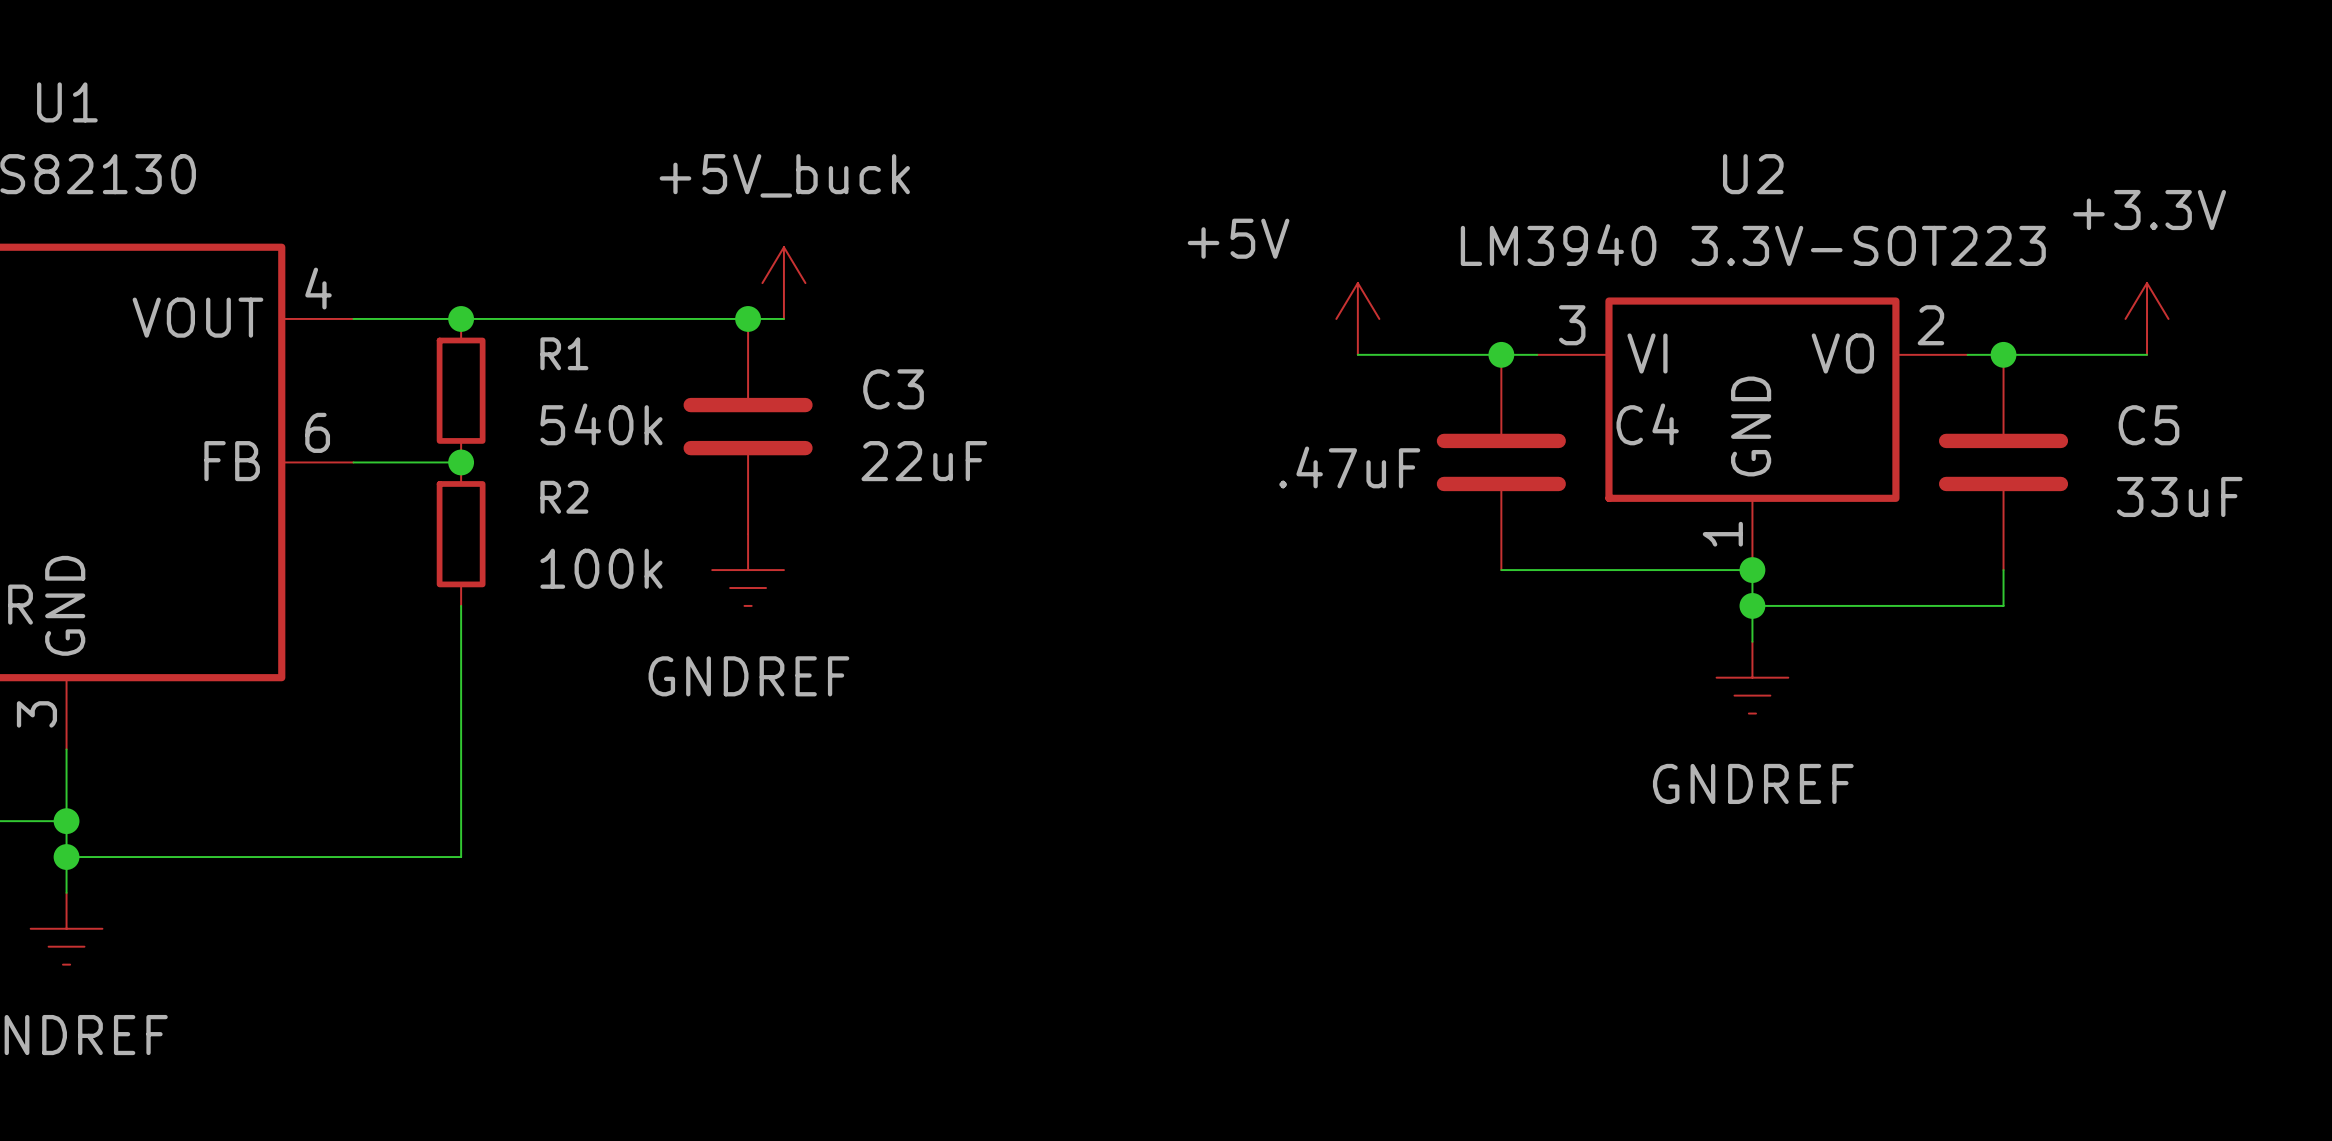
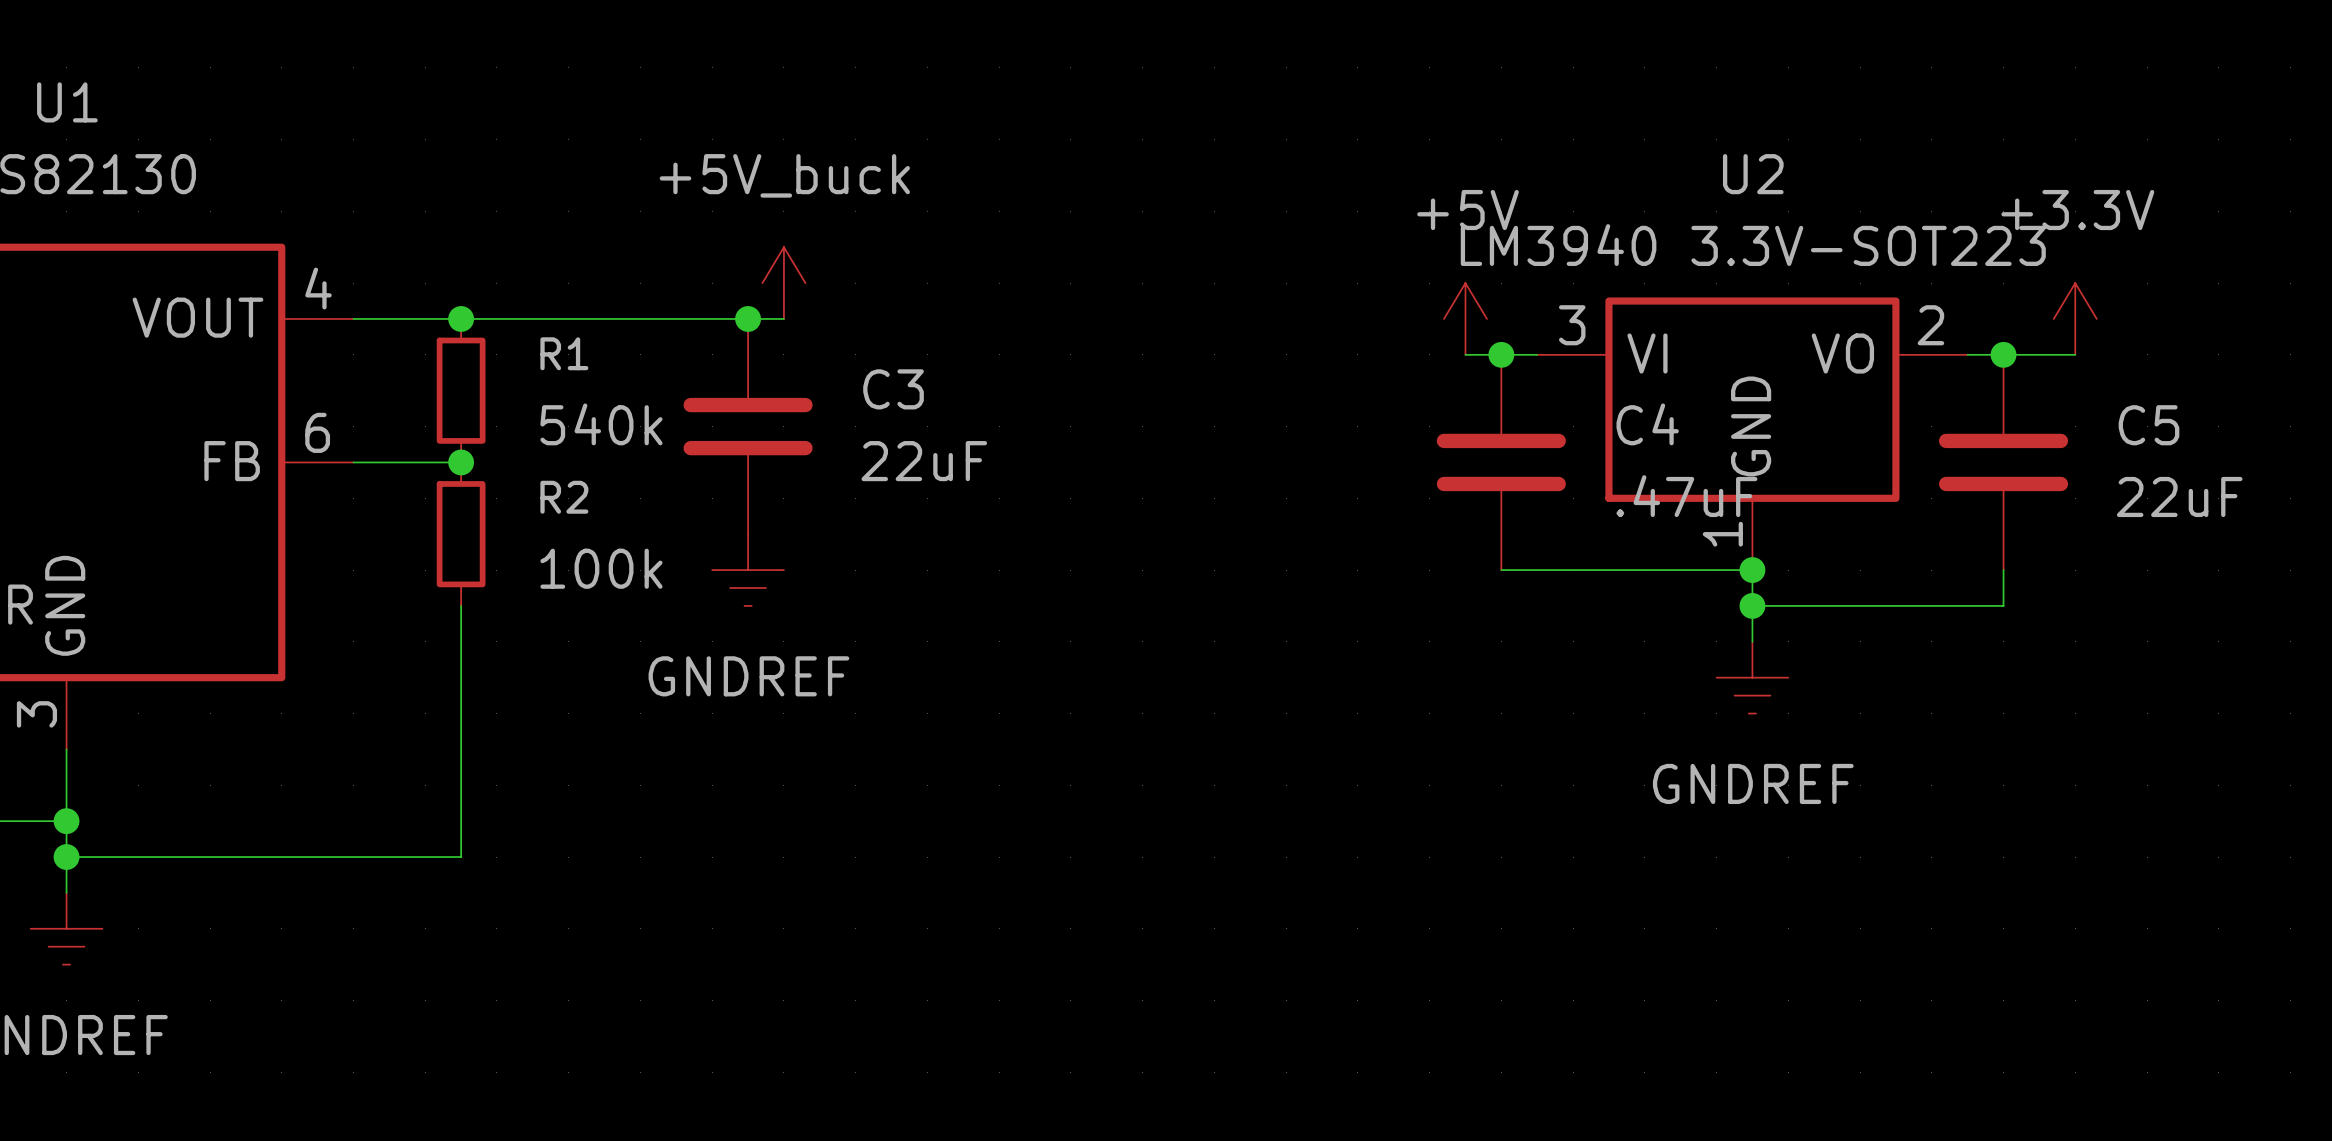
power symbol text position: +5V (1238, 238) -> +5V (1468, 210)
power symbol position: +5V (1357, 318) -> +5V (1465, 318)
power symbol position: +3.3V (2147, 318) -> +3.3V (2075, 318)
wire: (1357, 354) (1465, 354) -> none
wire: (2075, 354) (2147, 354) -> none
C4 value position: .47uF (1349, 467) -> .47uF (1686, 496)
C5 value: 33uF (2179, 496) -> 22uF (2179, 496)

